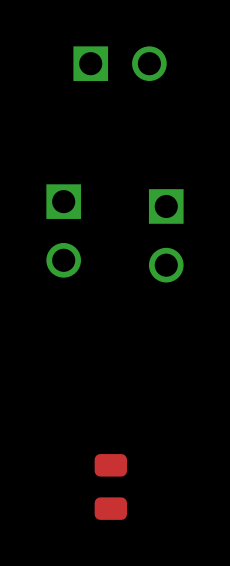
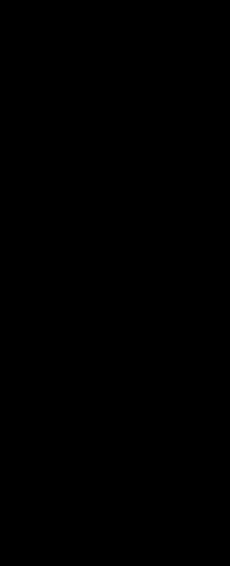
part: (120, 63) -> none
part: (63, 230) -> none
part: (166, 235) -> none
part: (110, 486) -> none

